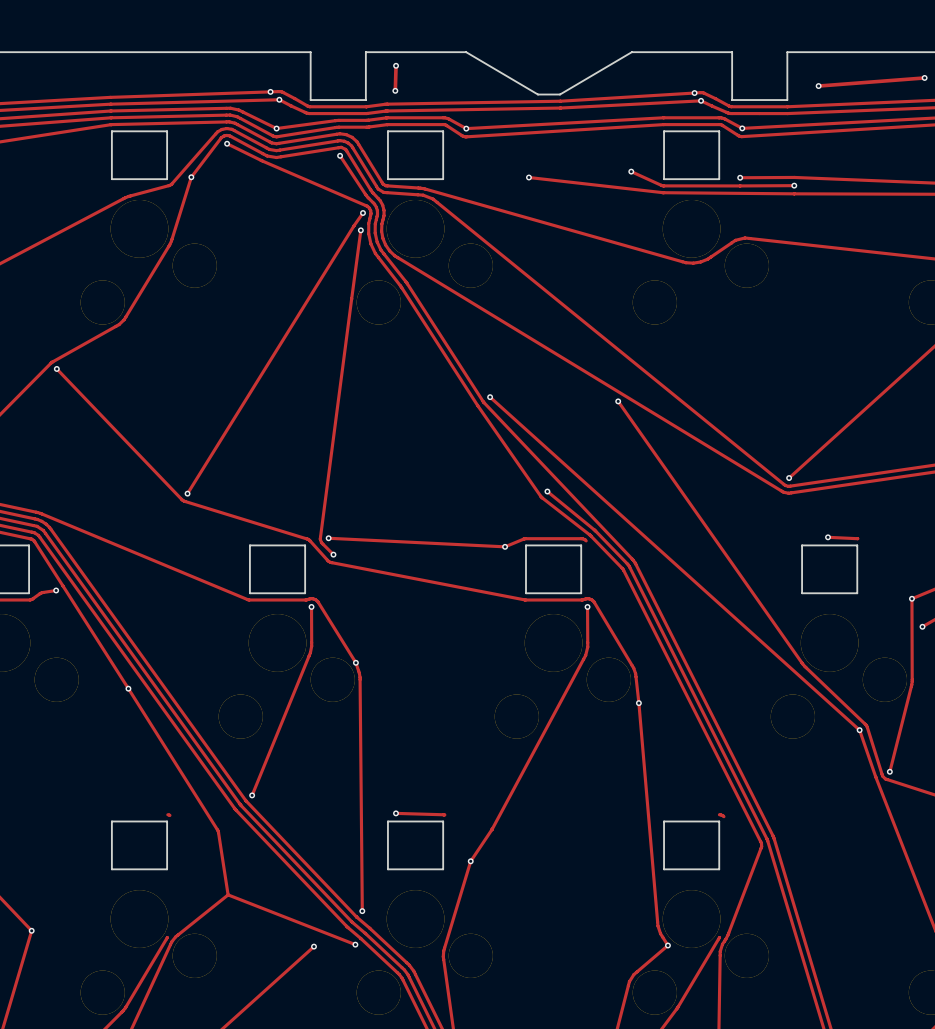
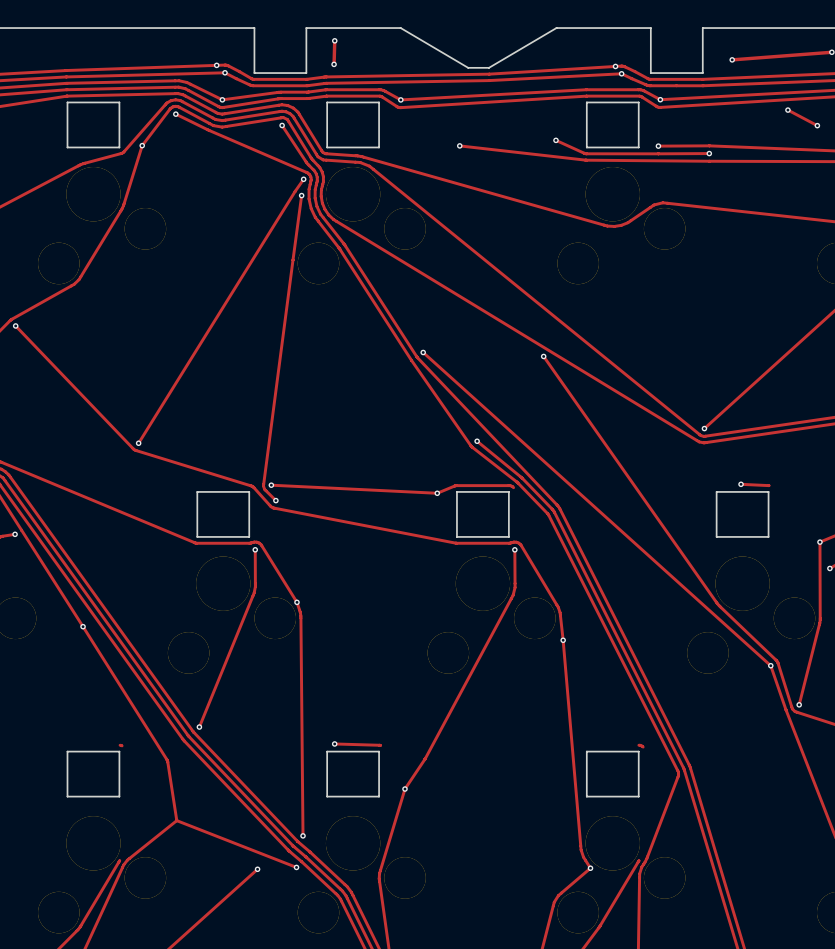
track: none -> (787, 110) (817, 125)
via: none -> (787, 110)
via: none -> (817, 125)

